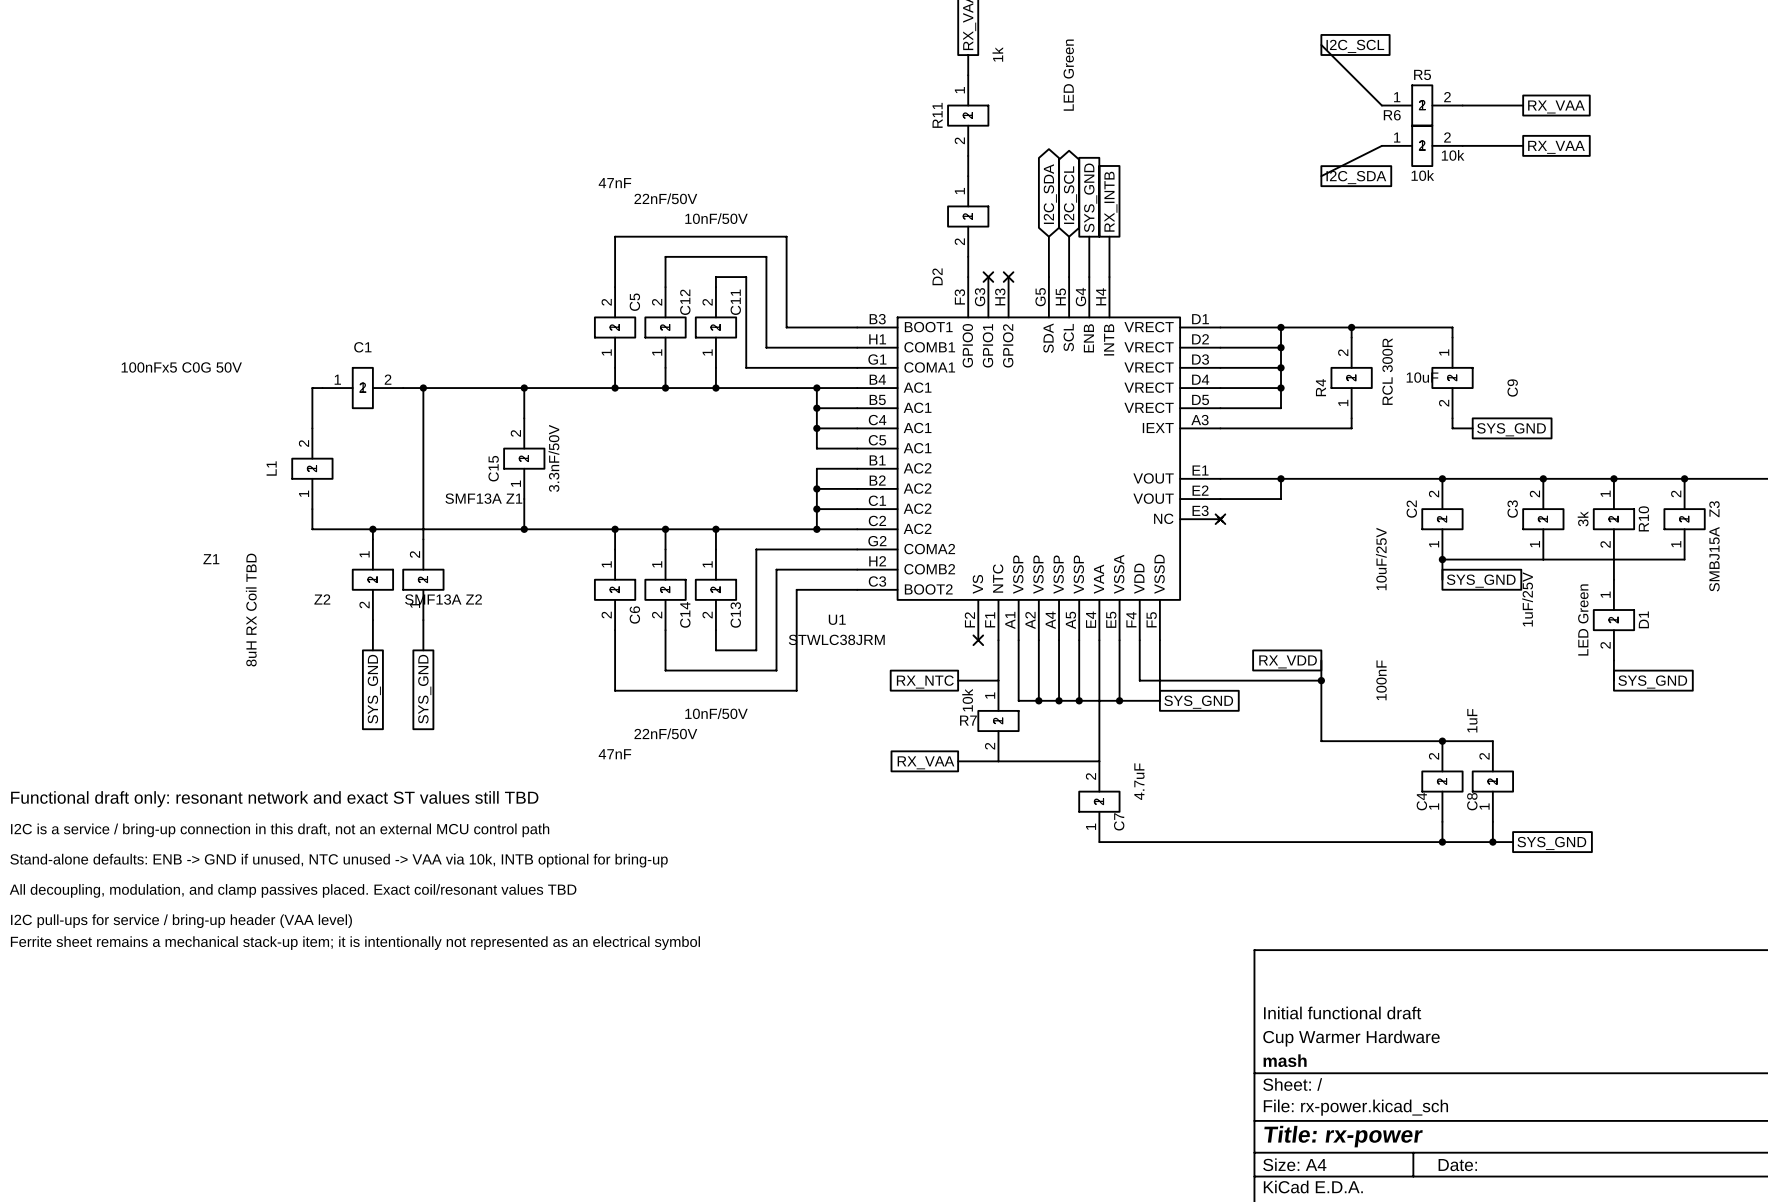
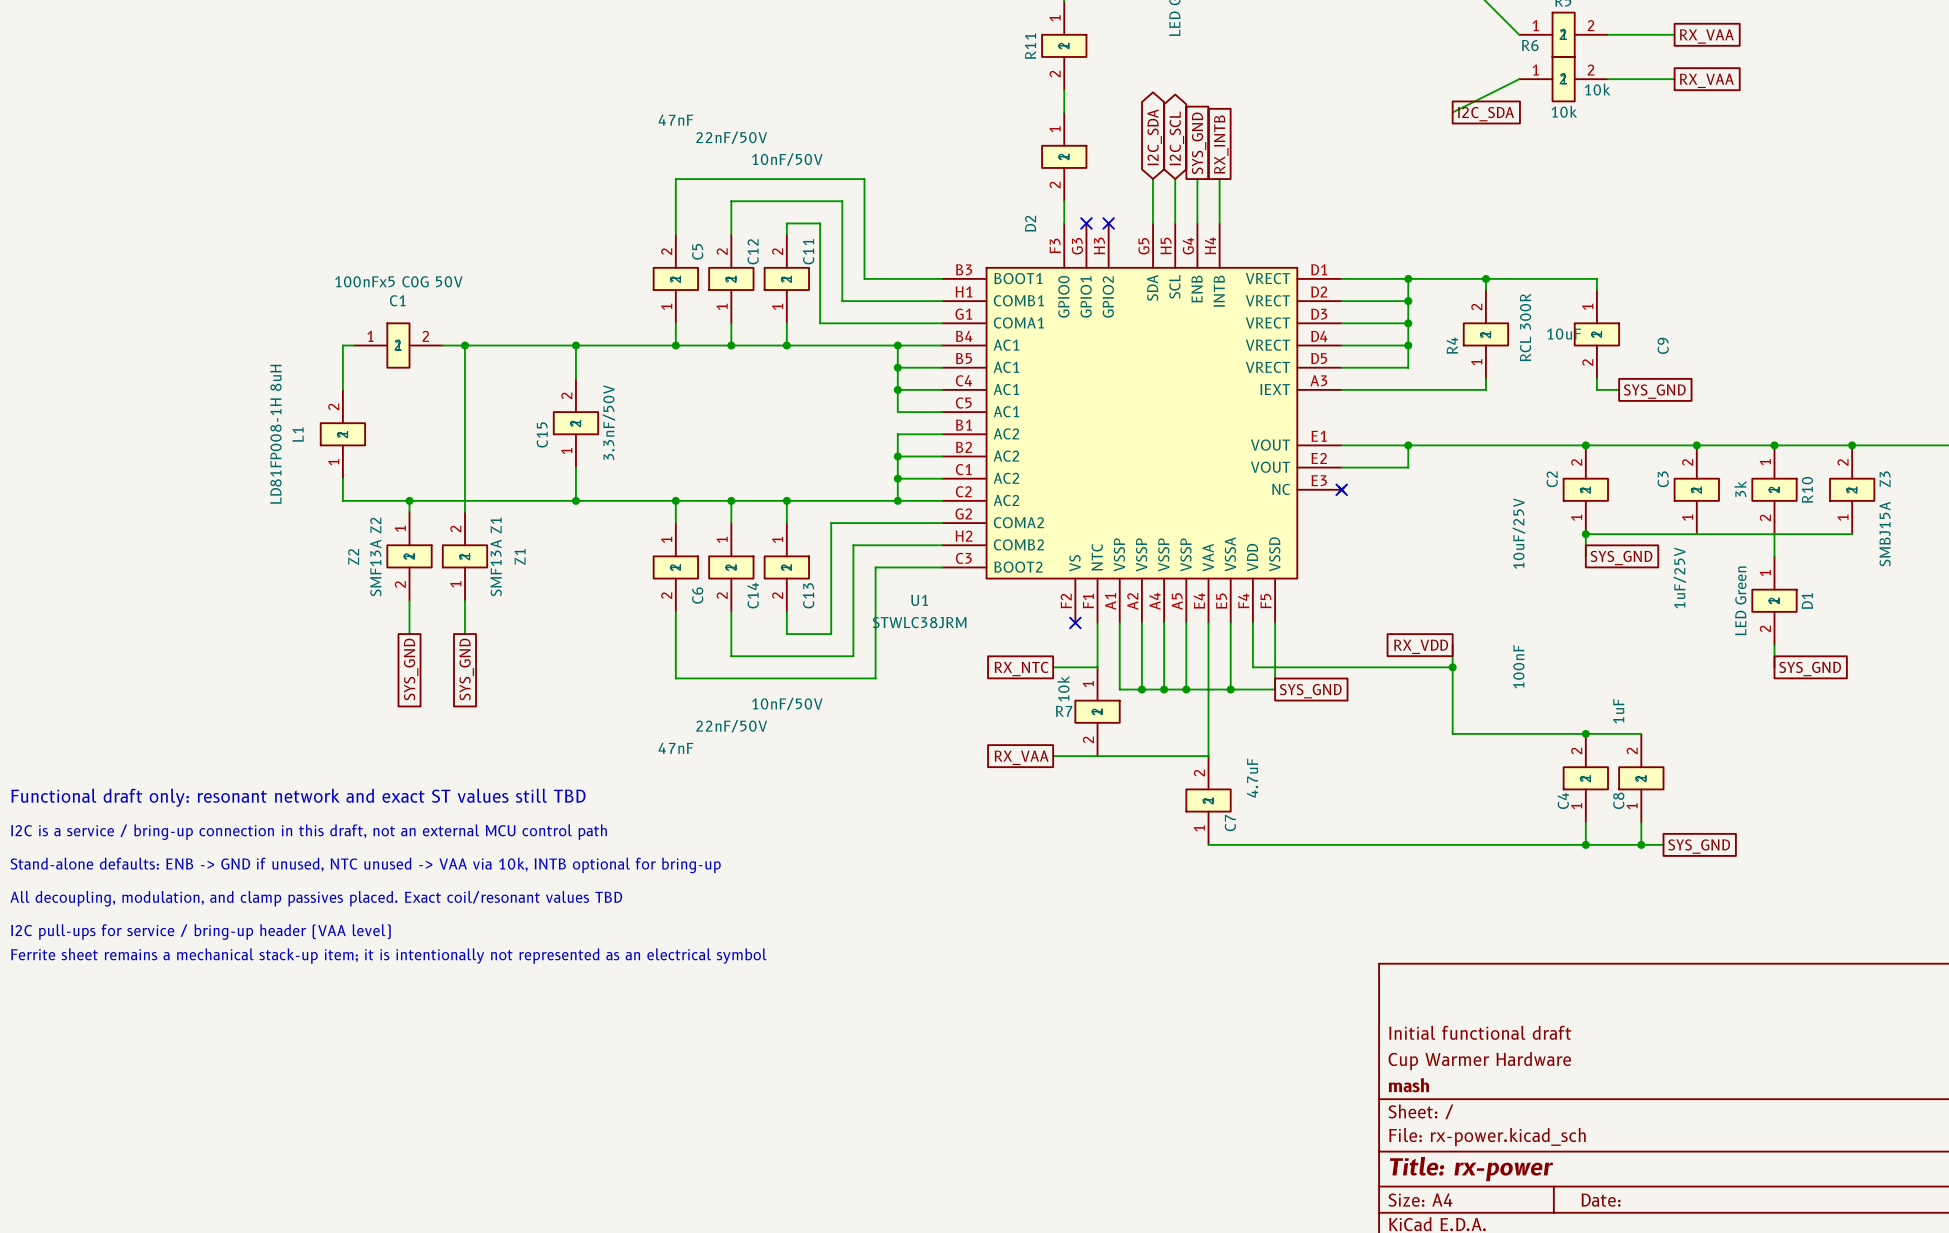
C1 value position: 100nFx5 C0G 50V (181, 367) -> 100nFx5 C0G 50V (398, 281)
Z1 value rotation: 0° (483, 498) -> 90° counterclockwise (496, 556)
Z1 name rotation: 0° (211, 559) -> 90° counterclockwise (520, 557)
Z1 name position: Z1 (211, 559) -> Z1 (520, 557)
Z2 name rotation: 0° (322, 599) -> 90° counterclockwise (353, 557)
Z2 value rotation: 0° (443, 599) -> 90° counterclockwise (375, 556)
Z2 value position: SMF13A Z2 (443, 599) -> SMF13A Z2 (375, 556)
L1 value: 8uH RX Coil TBD (251, 610) -> LD81FP008-1H 8uH (275, 434)

